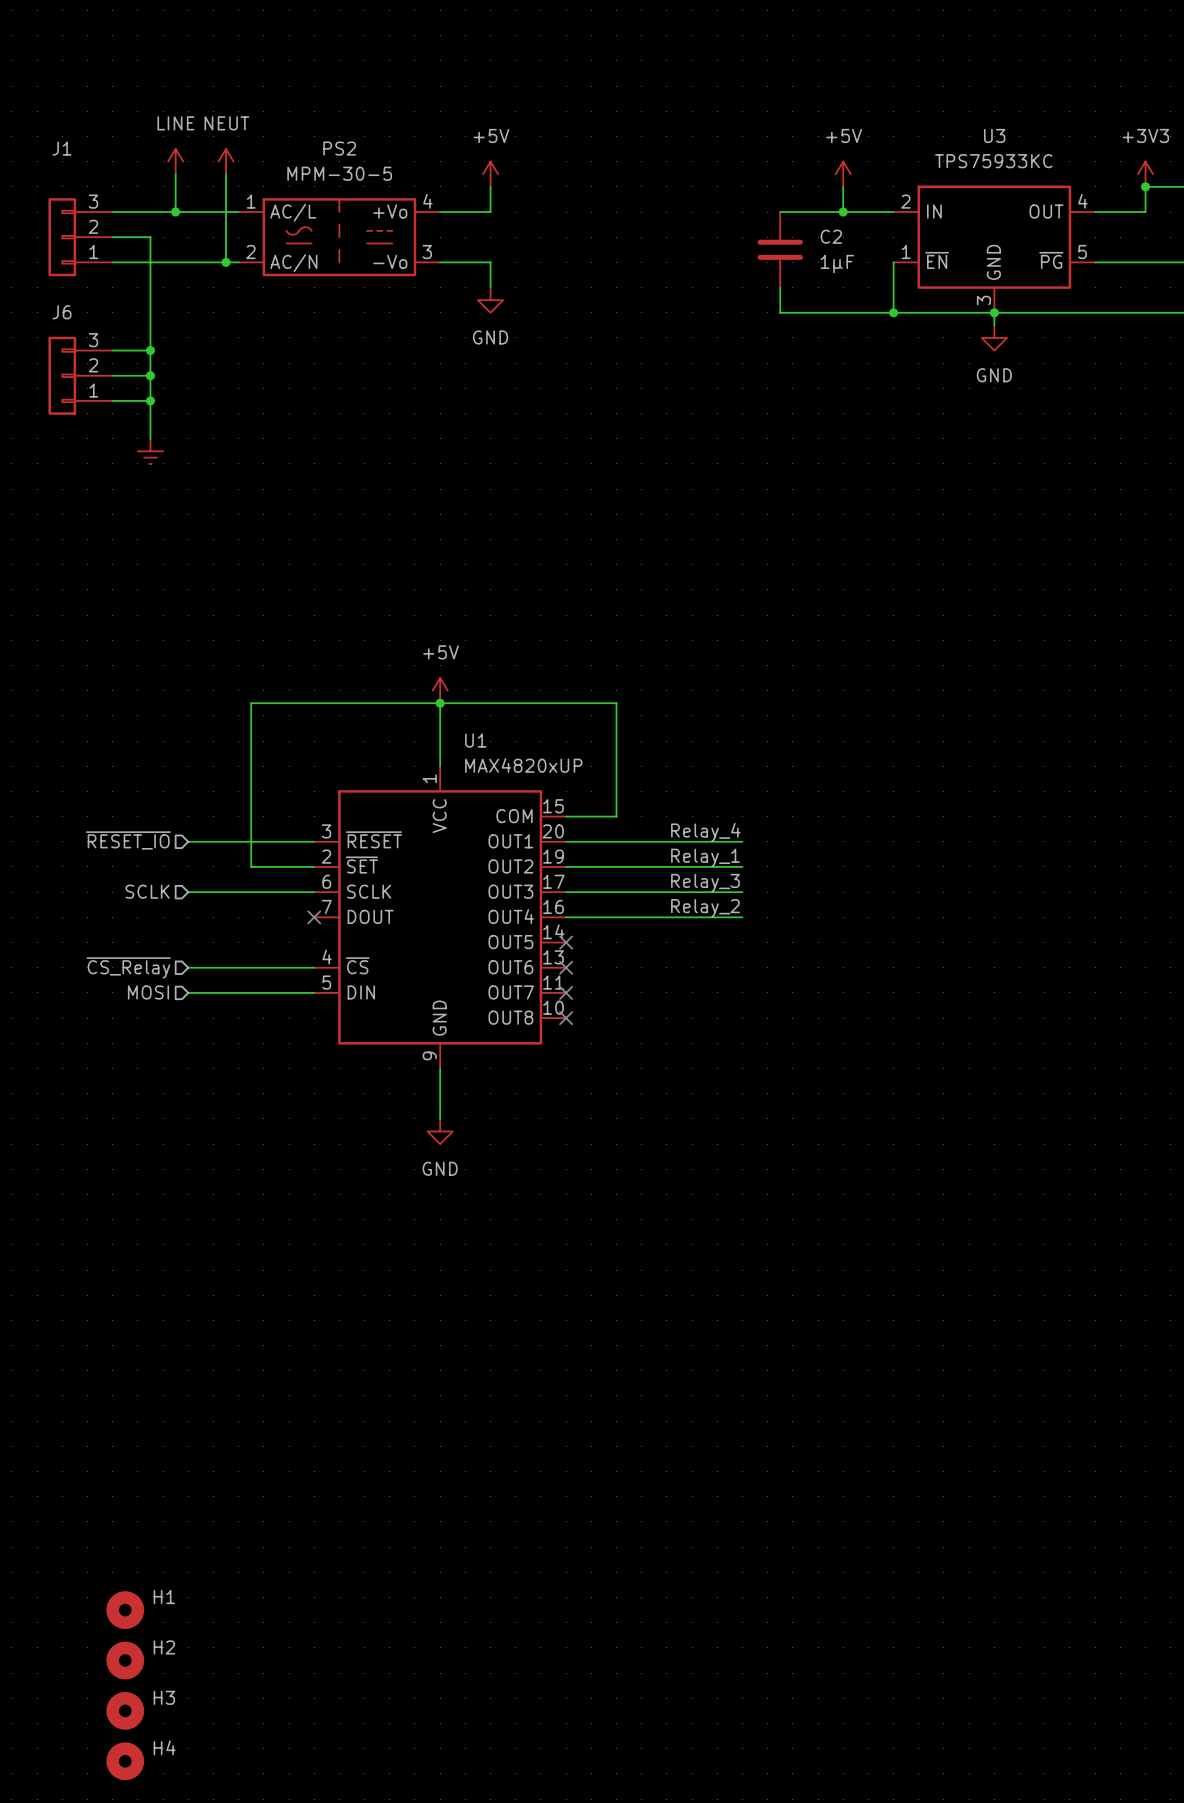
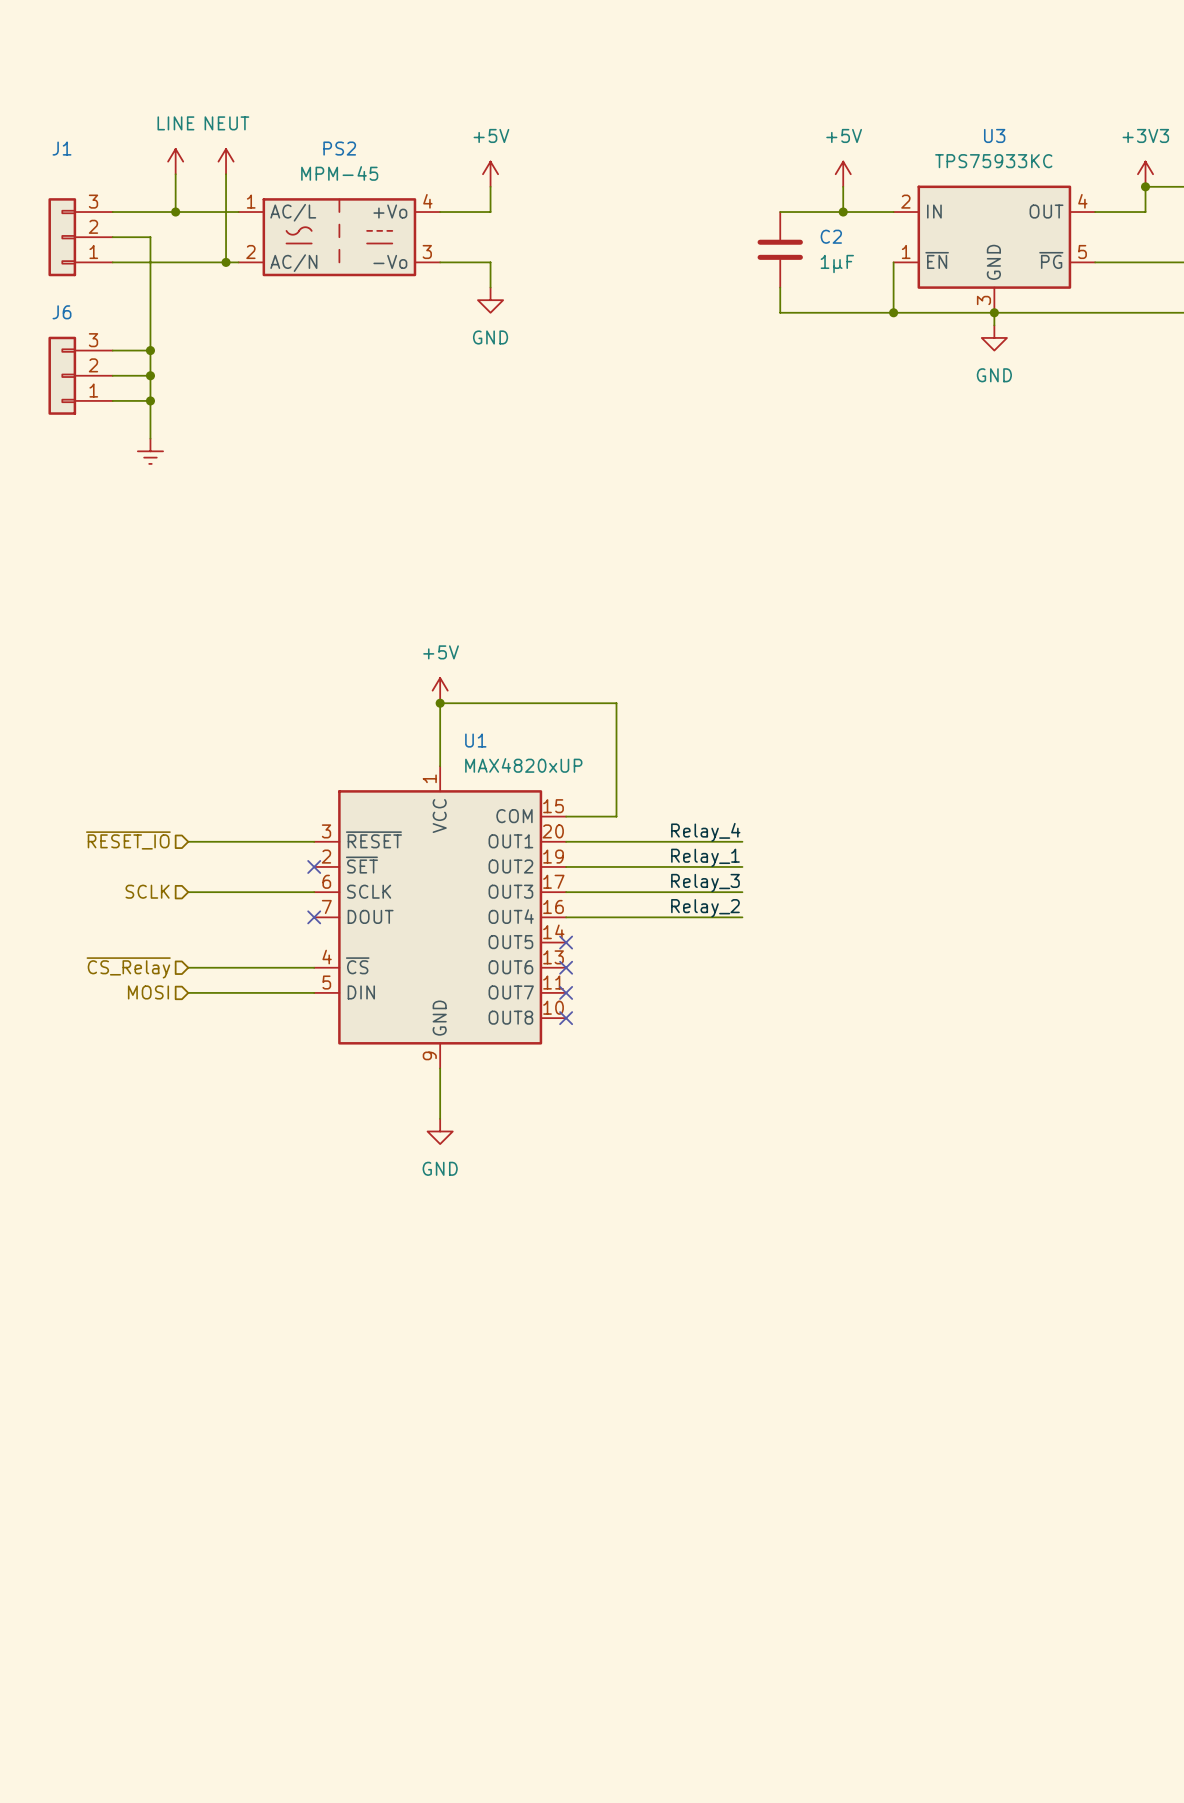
PS2 value: MPM-30-5 (339, 173) -> MPM-45 (339, 173)
wire: (440, 703) (251, 703) (251, 866) (314, 866) -> none
no-connect mark: none -> (314, 866)
H1: (125, 1610) -> none
H2: (125, 1660) -> none
H3: (125, 1710) -> none
H4: (125, 1761) -> none

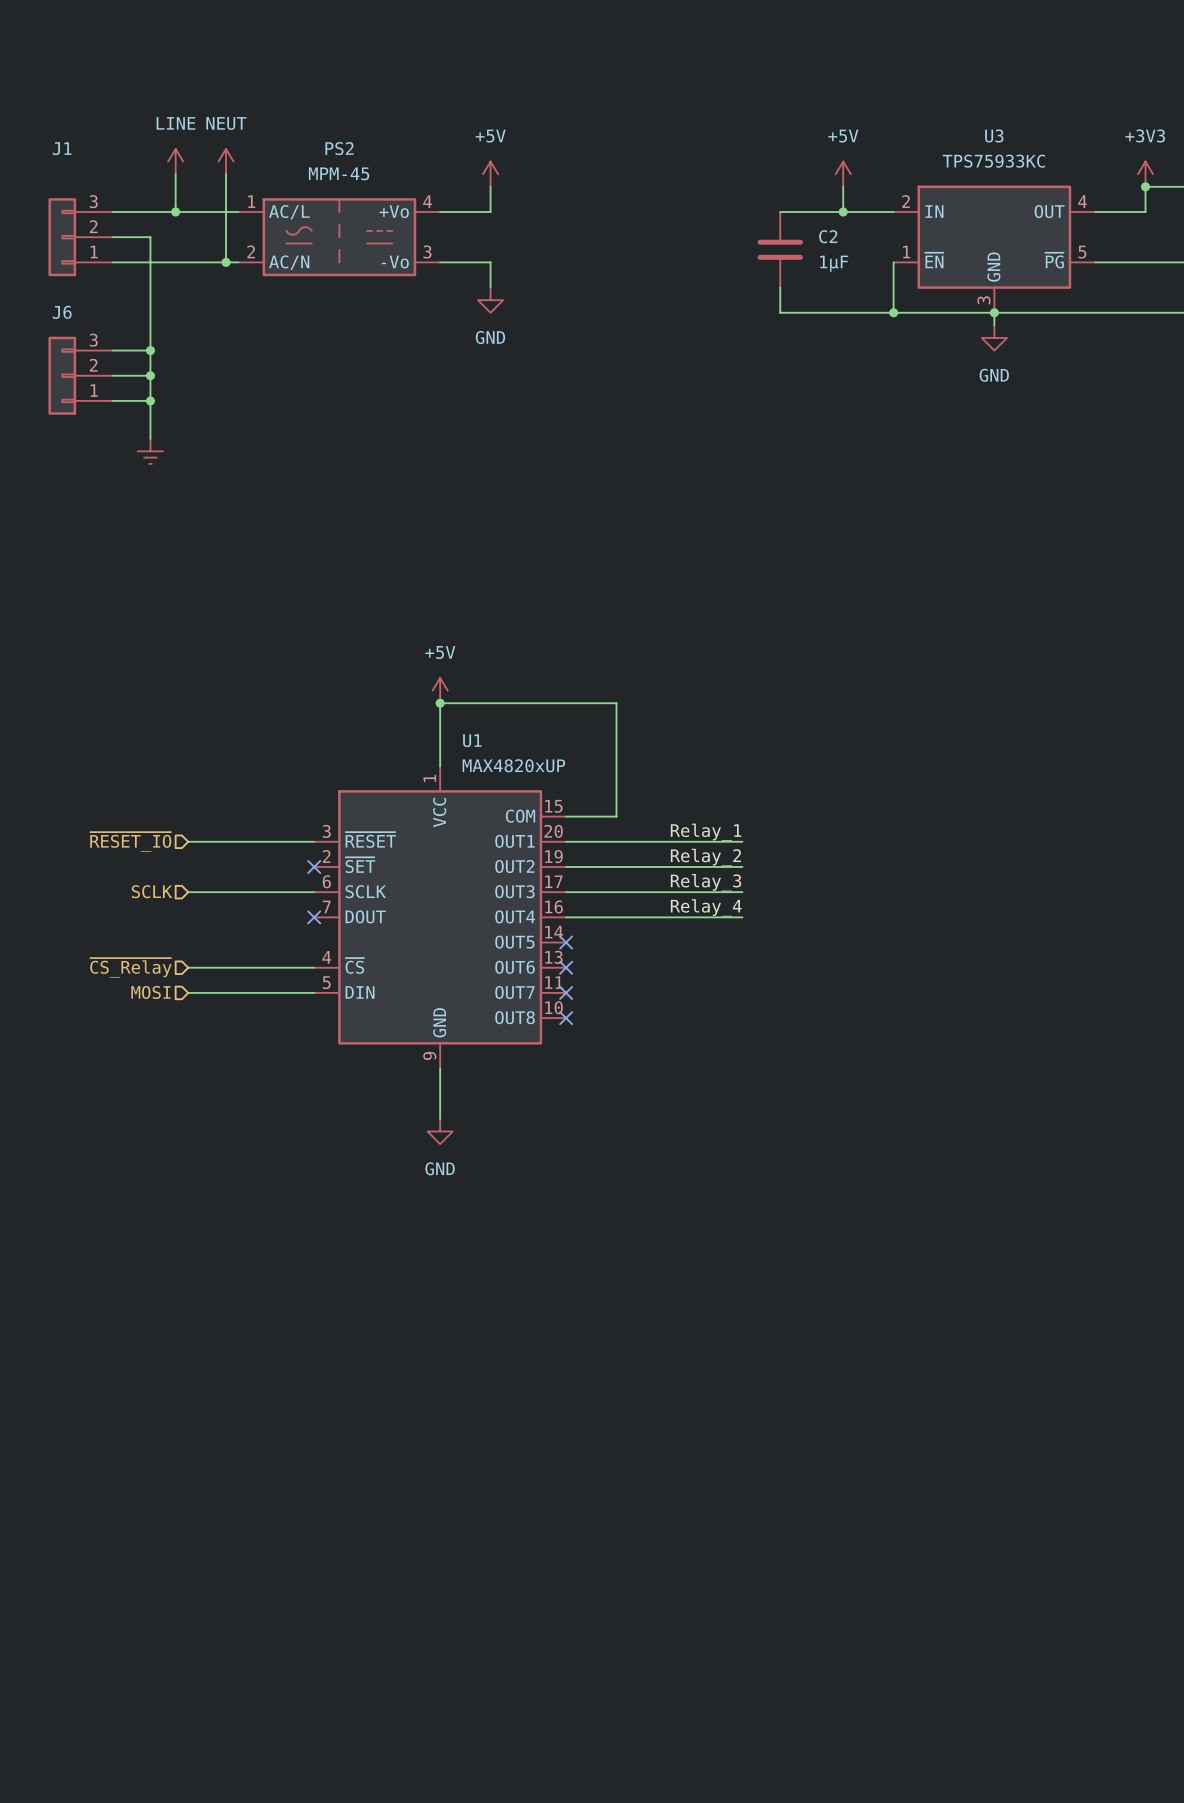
label: Relay_4 (705, 832) -> Relay_1 (706, 832)
label: Relay_1 (705, 857) -> Relay_2 (705, 857)
label: Relay_2 (705, 908) -> Relay_4 (706, 907)

